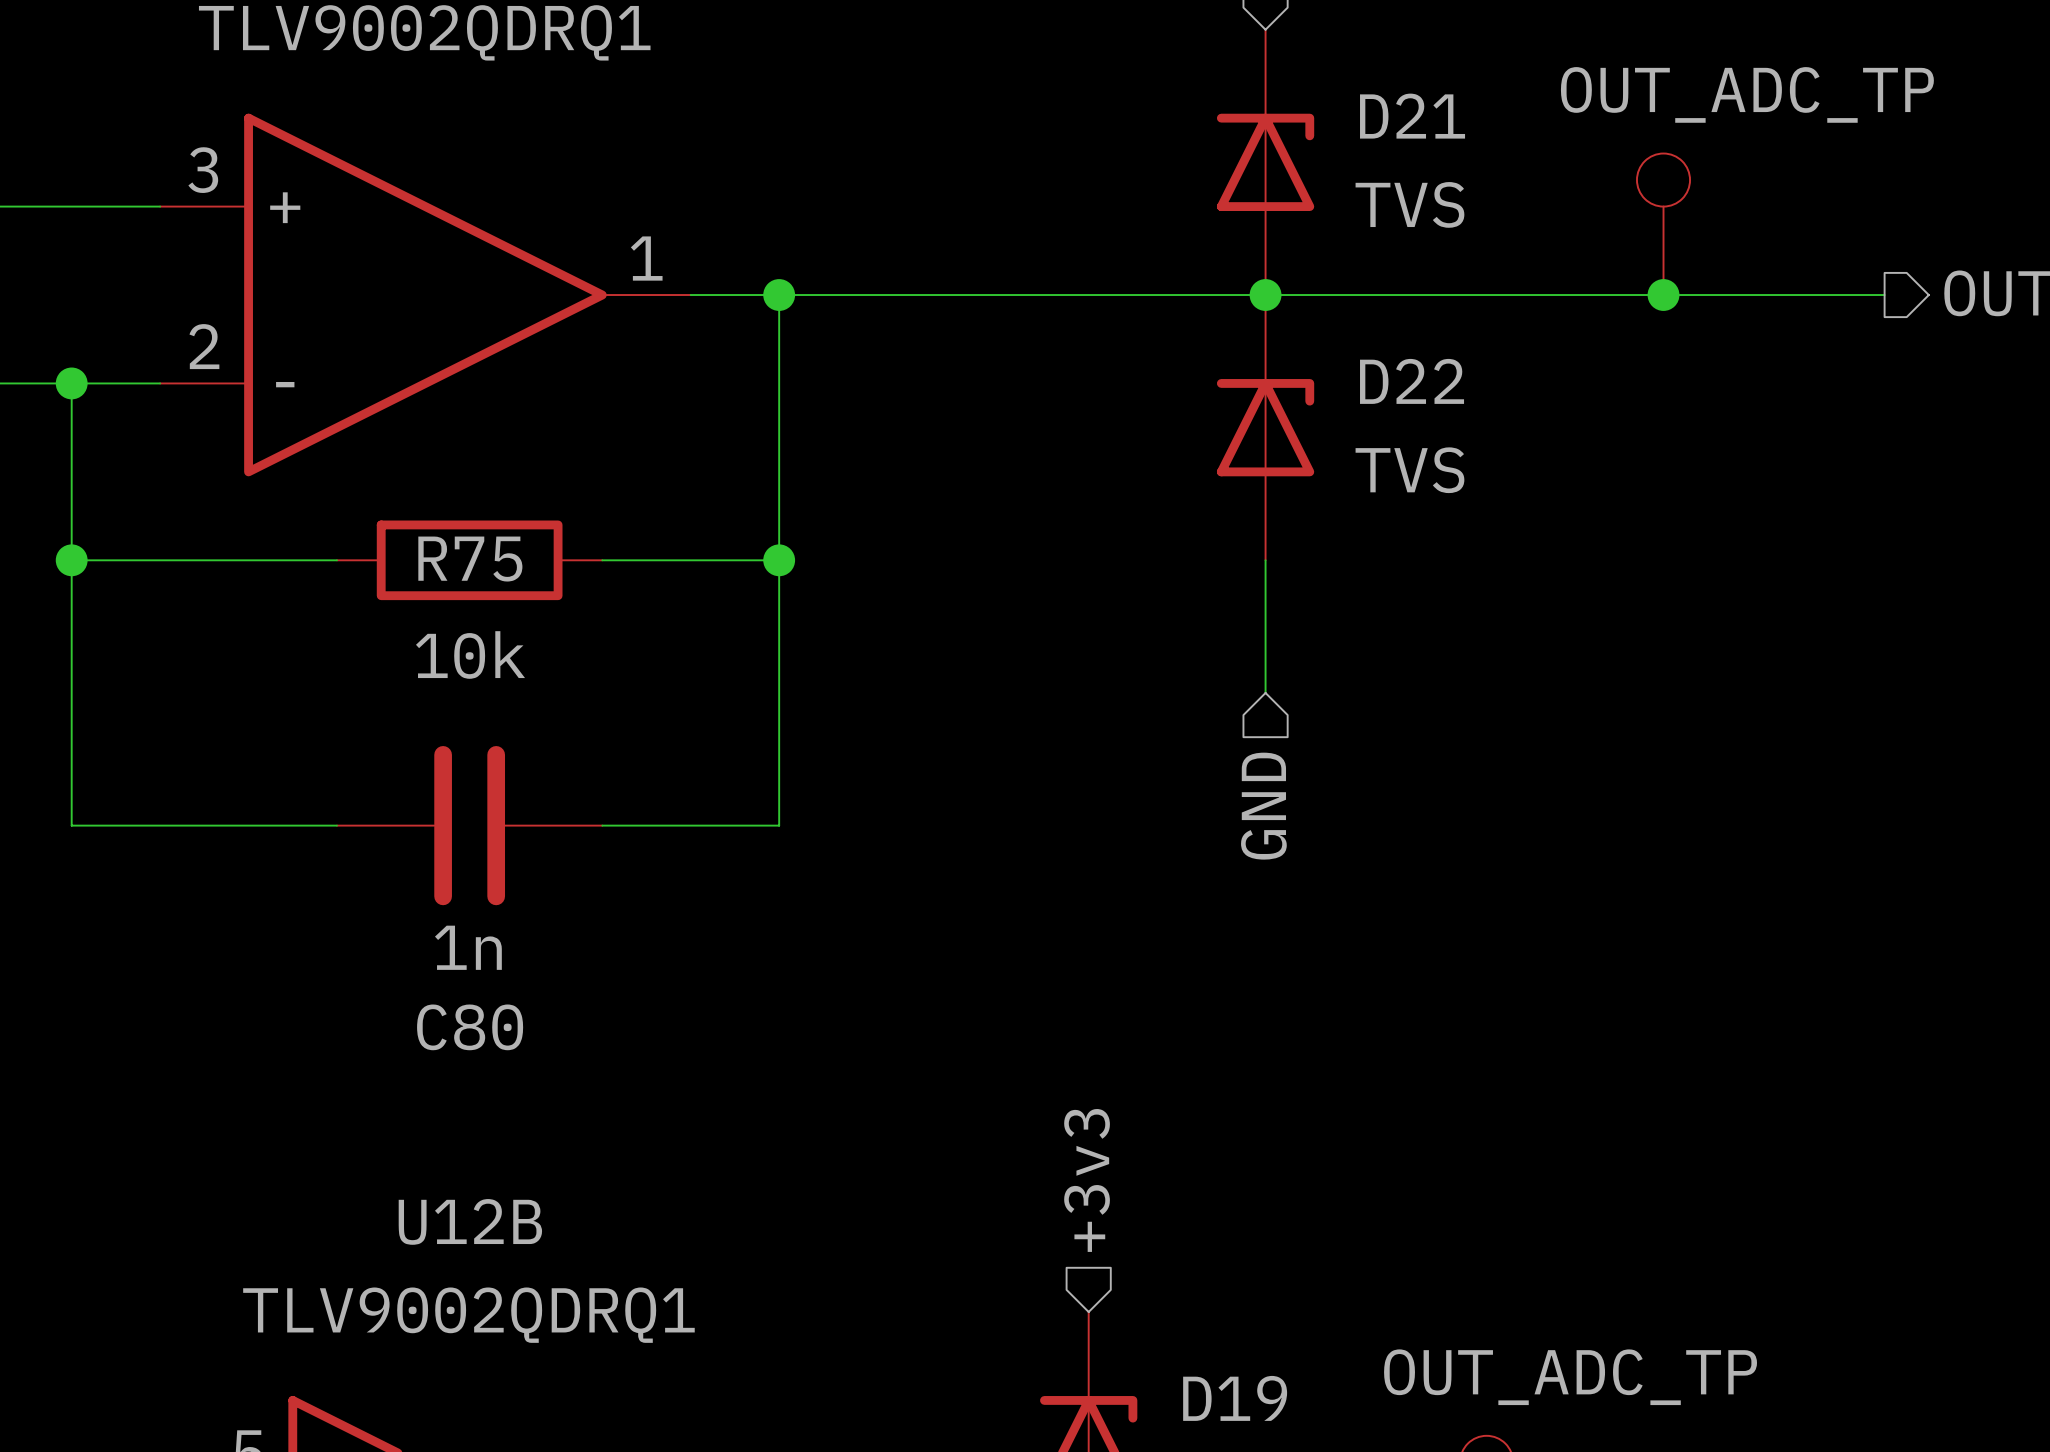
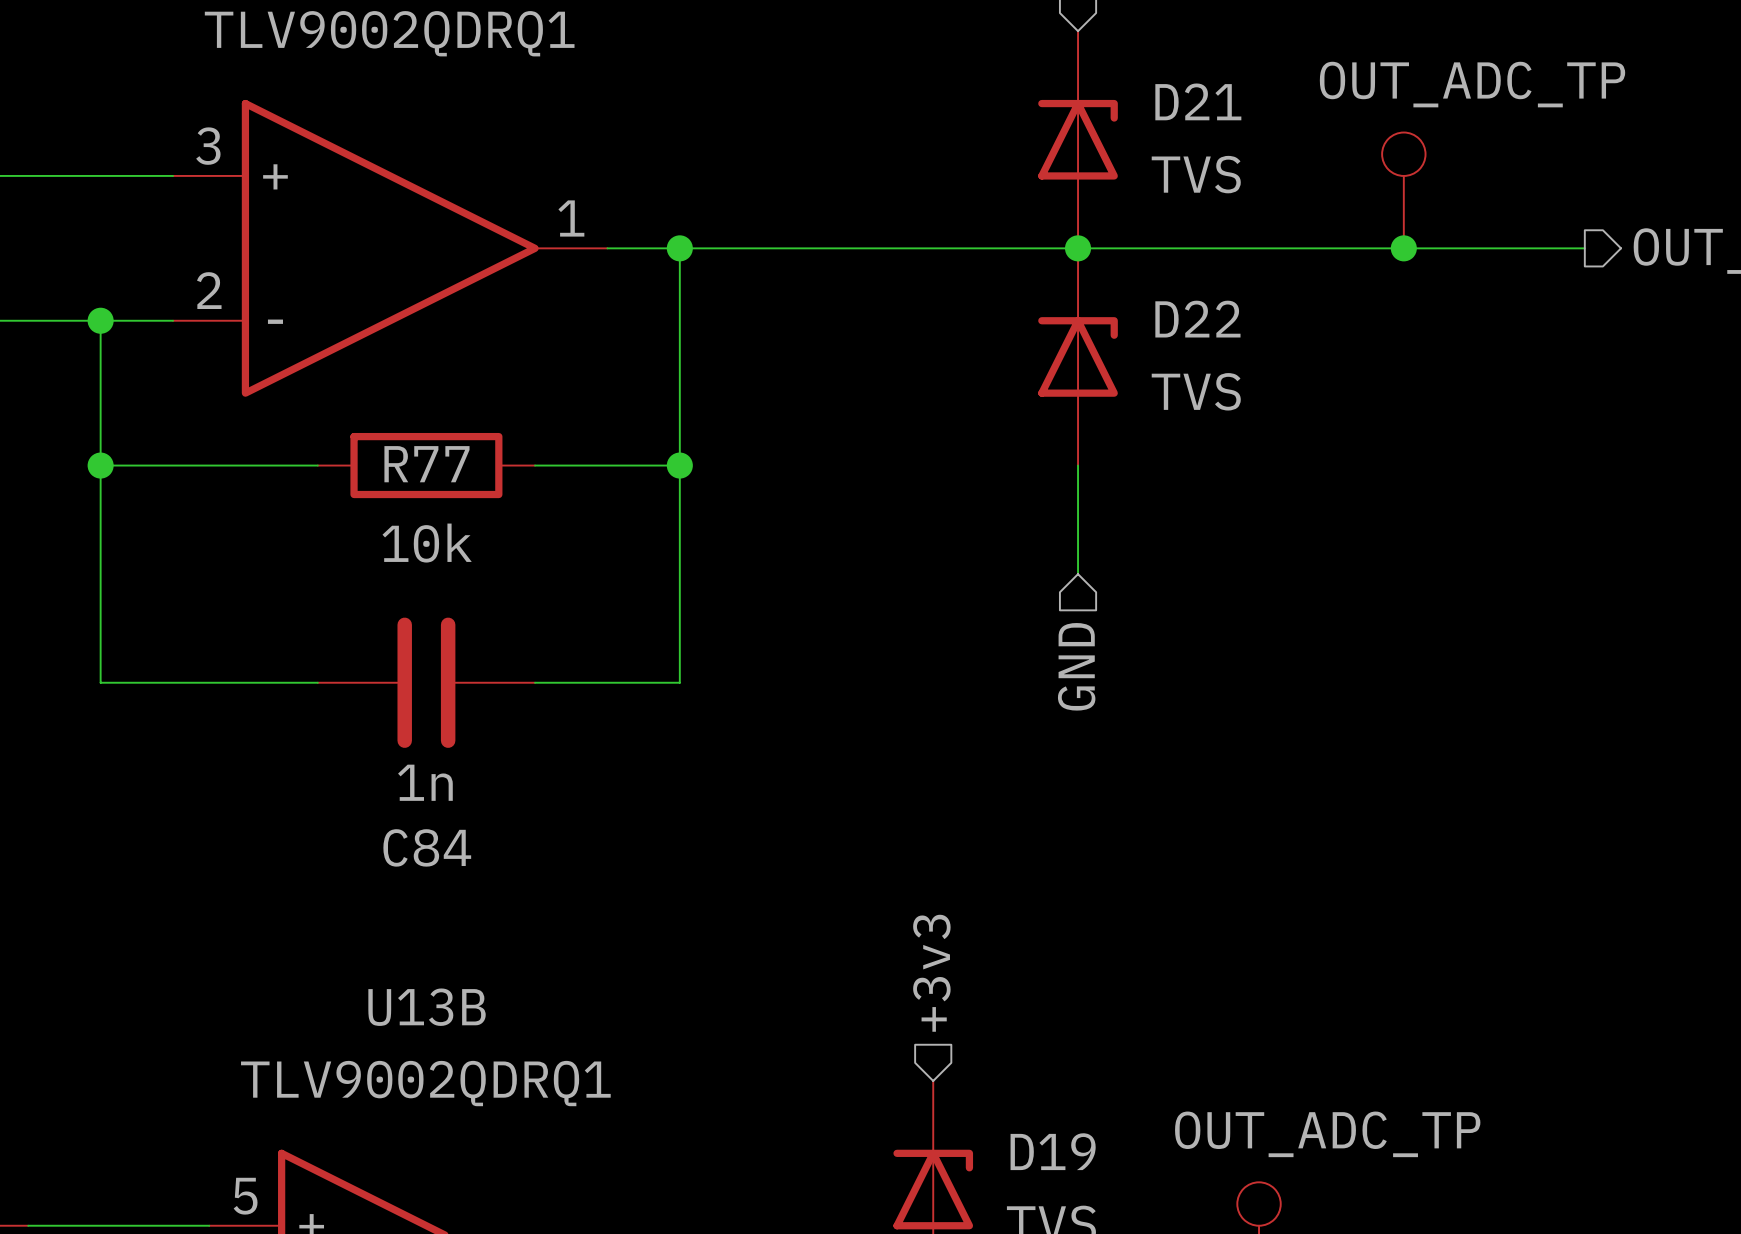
R75 name: R75 (470, 559) -> R77 (426, 464)
C80 name: C80 (470, 1027) -> C84 (427, 847)
U12B name: U12B (470, 1221) -> U13B (427, 1007)

